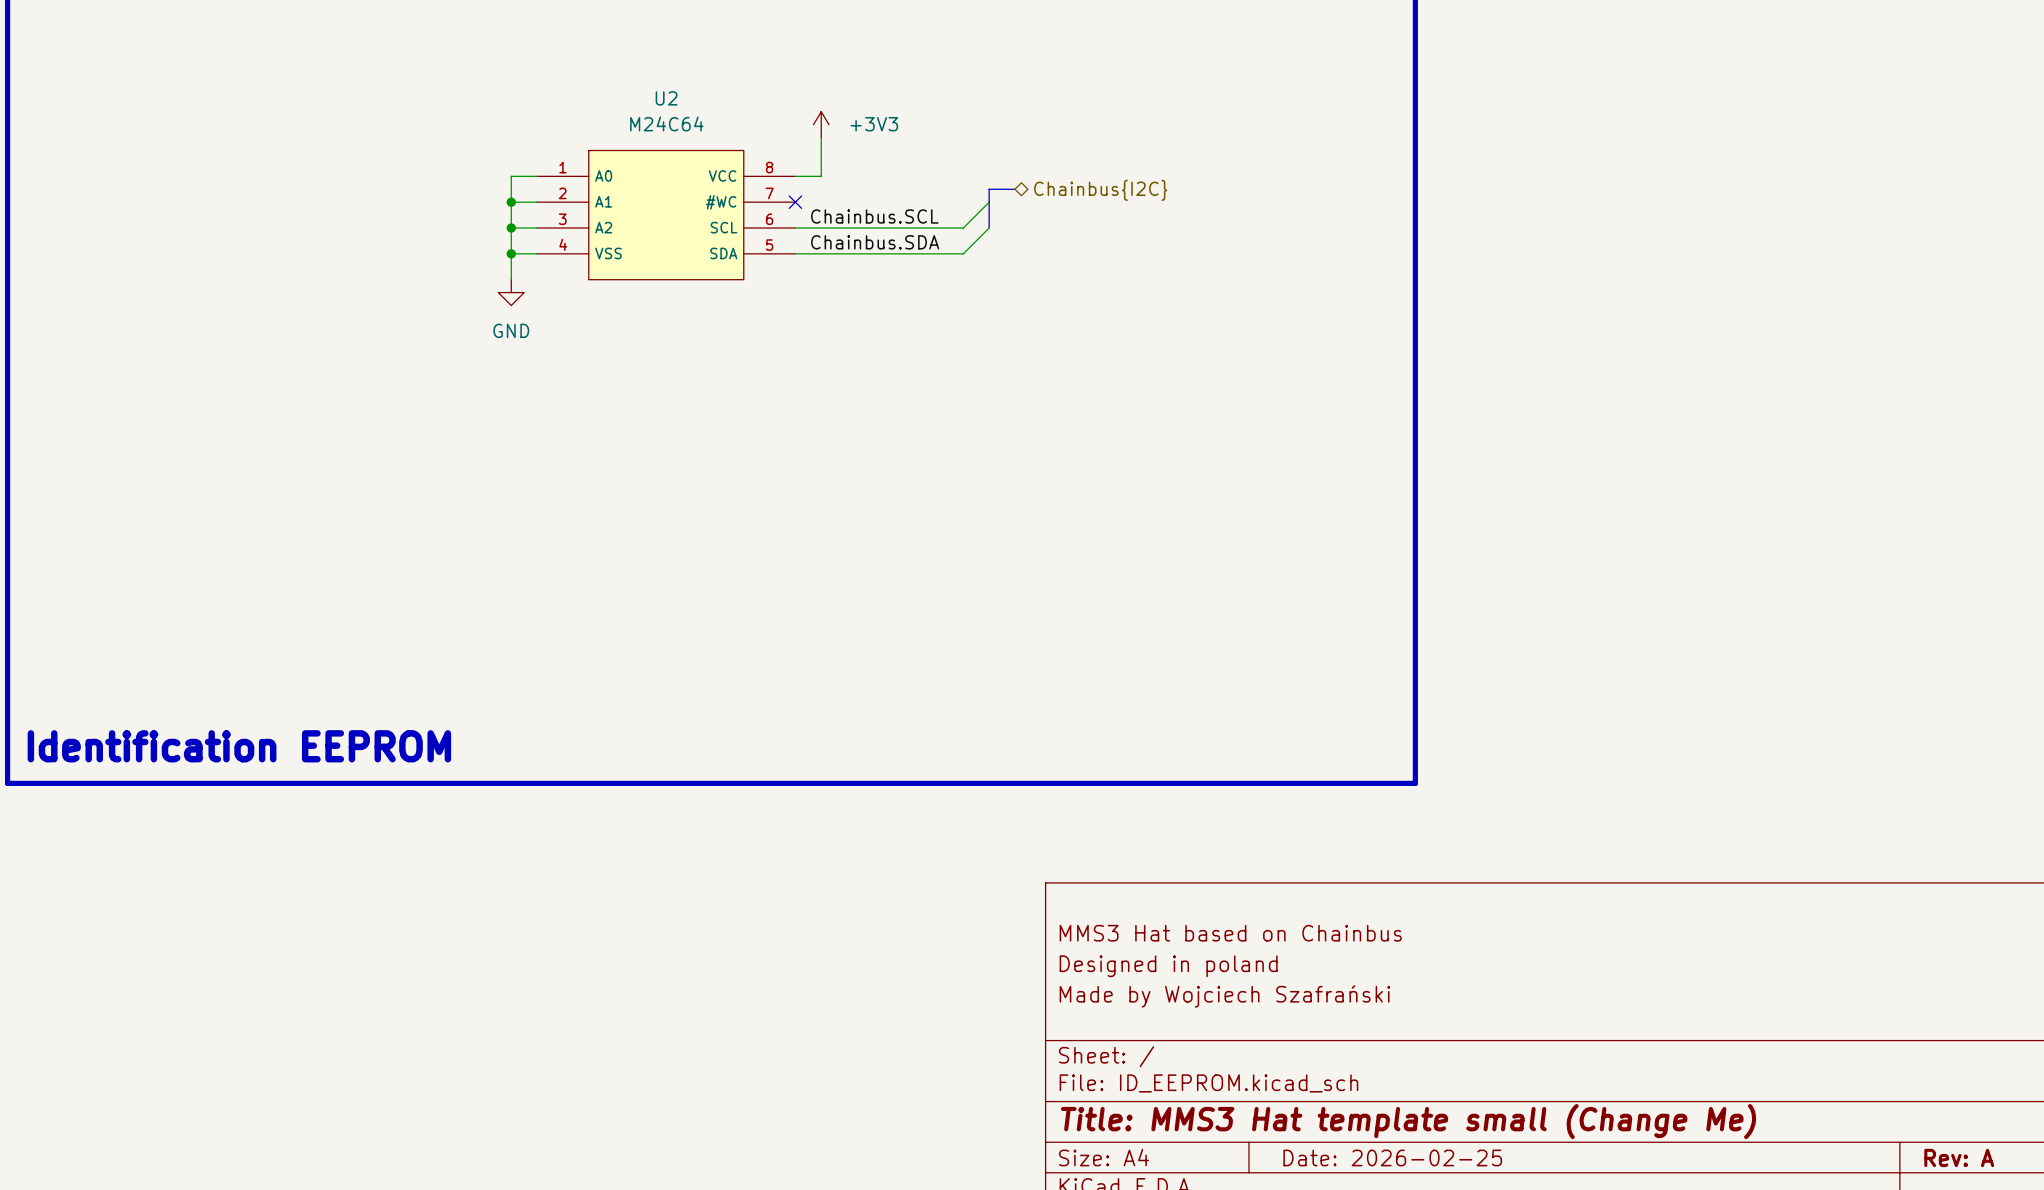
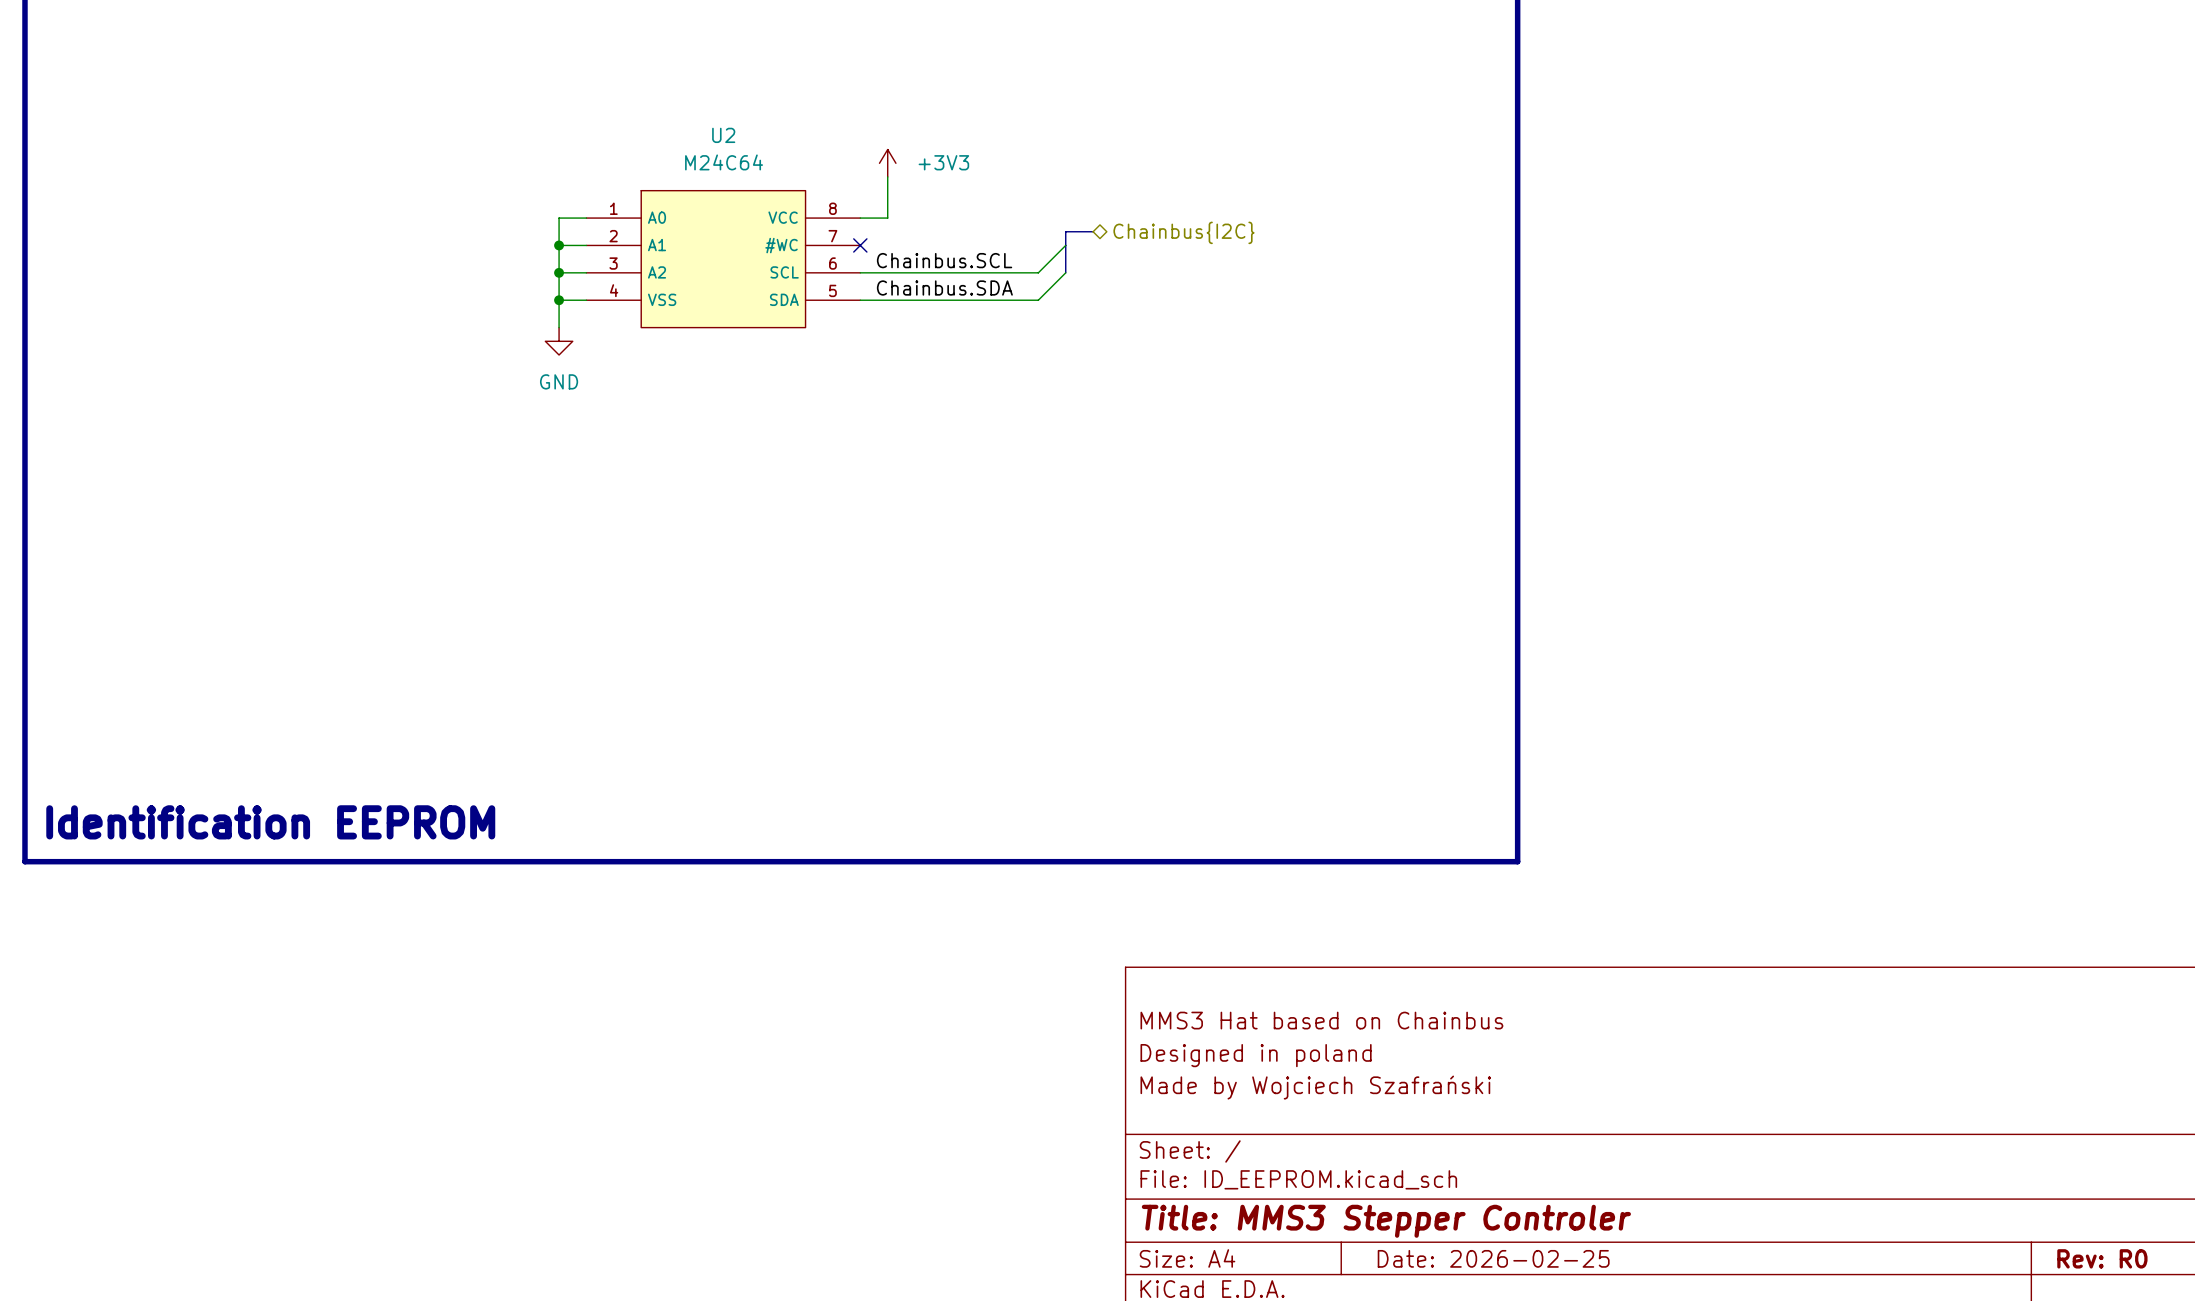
title block: Title: MMS3 Hat template small (Change Me) (1408, 1121) -> Title: MMS3 Stepper Controler (1386, 1221)
title block: Rev: A (1959, 1157) -> Rev: R0 (2102, 1258)

